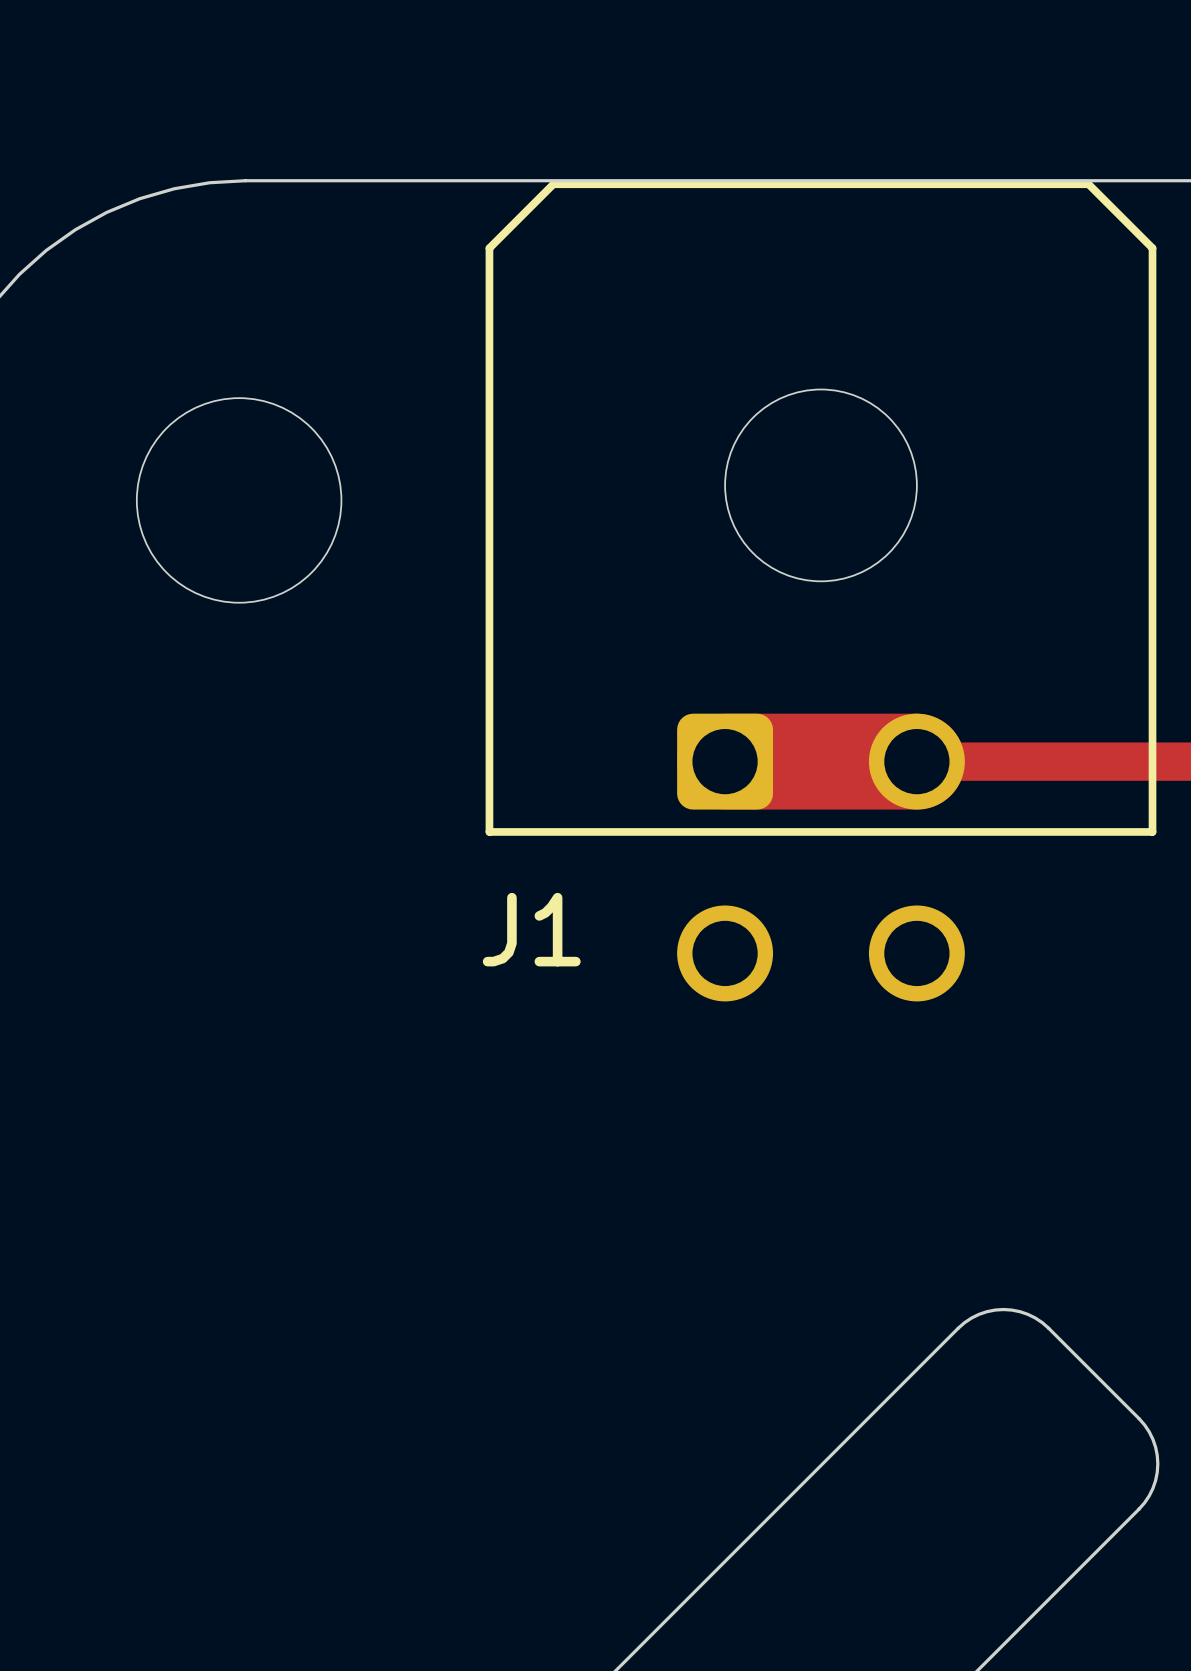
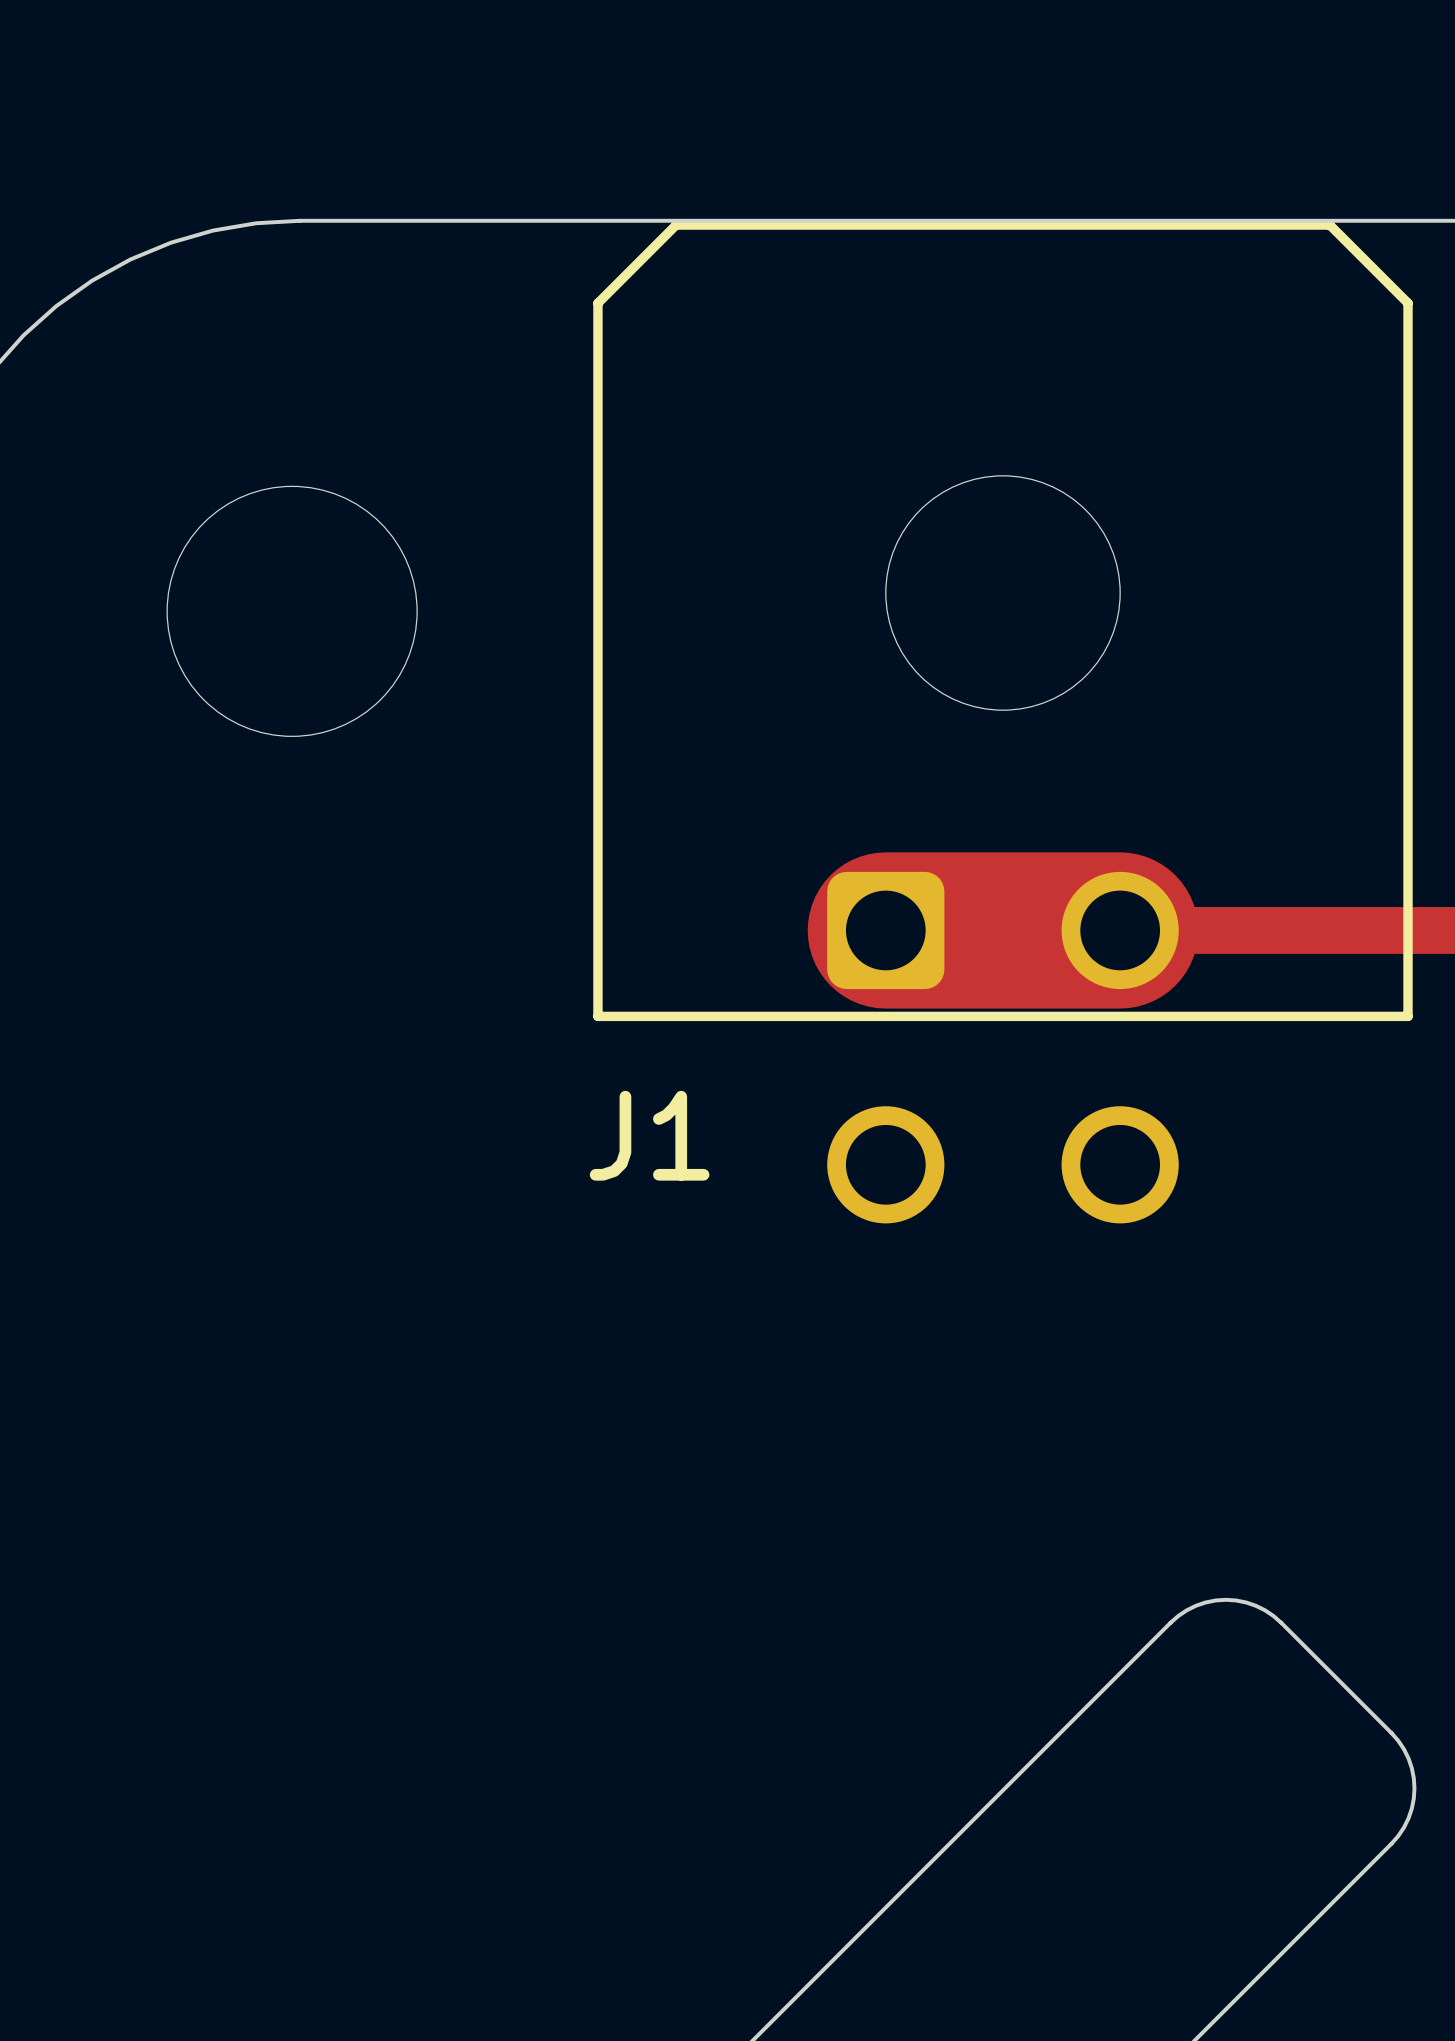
top track width: thin (725, 761) (916, 761) -> thick (885, 930) (1120, 930)

